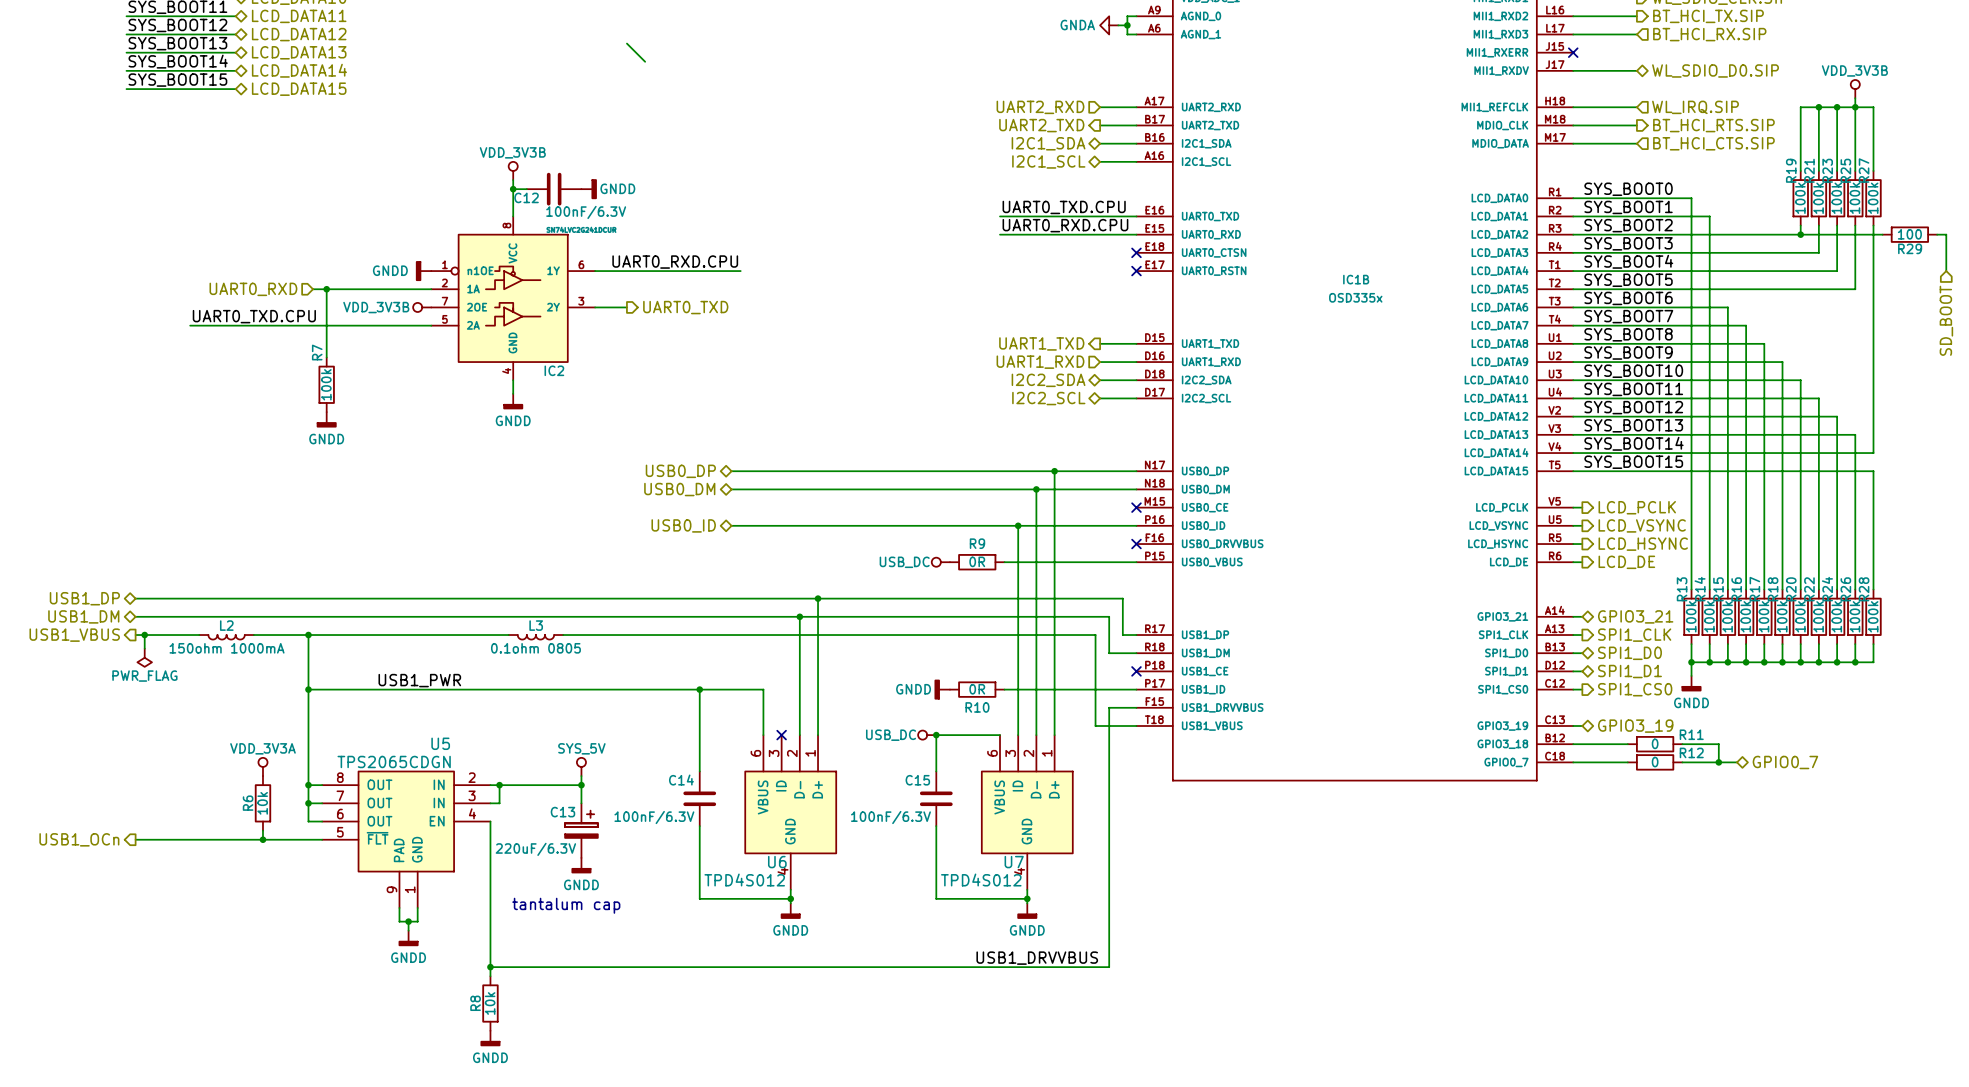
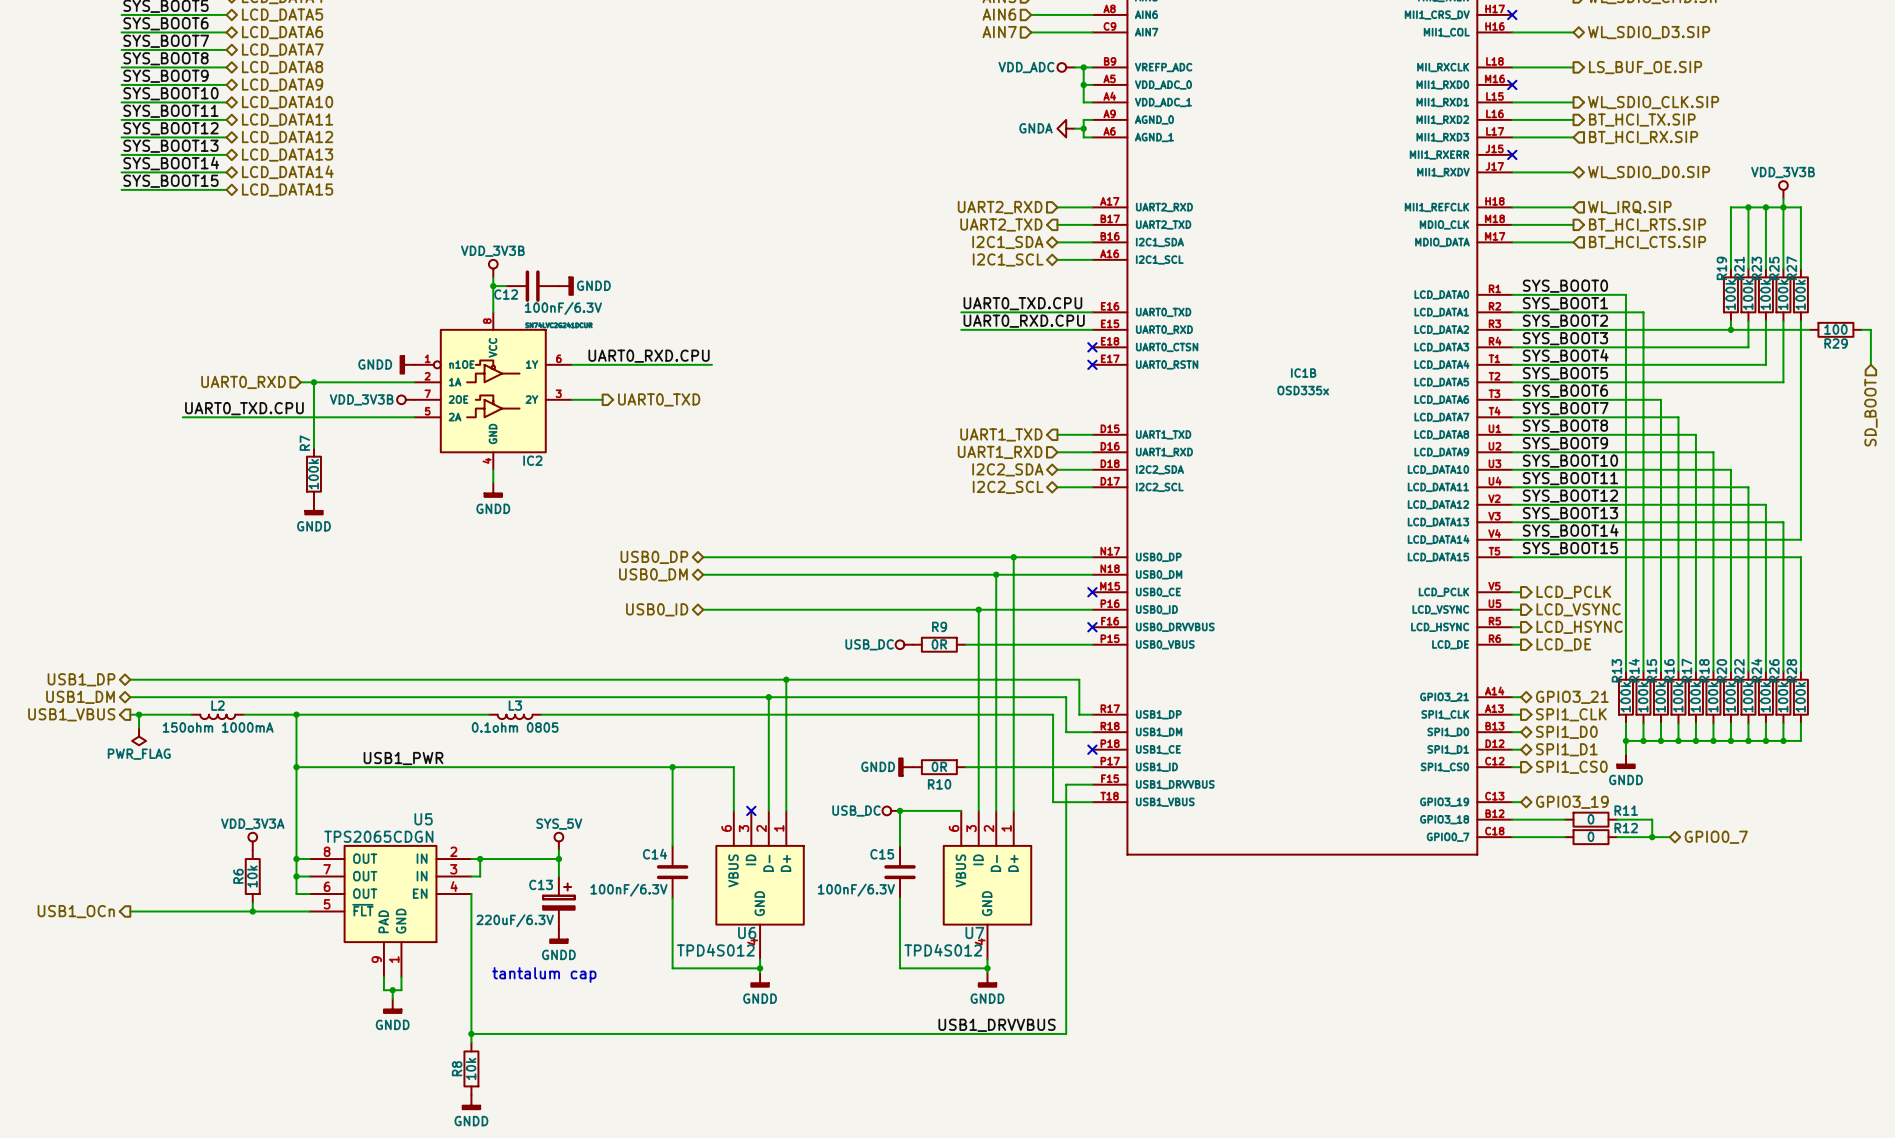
wire: (626, 43) (645, 61) -> none

